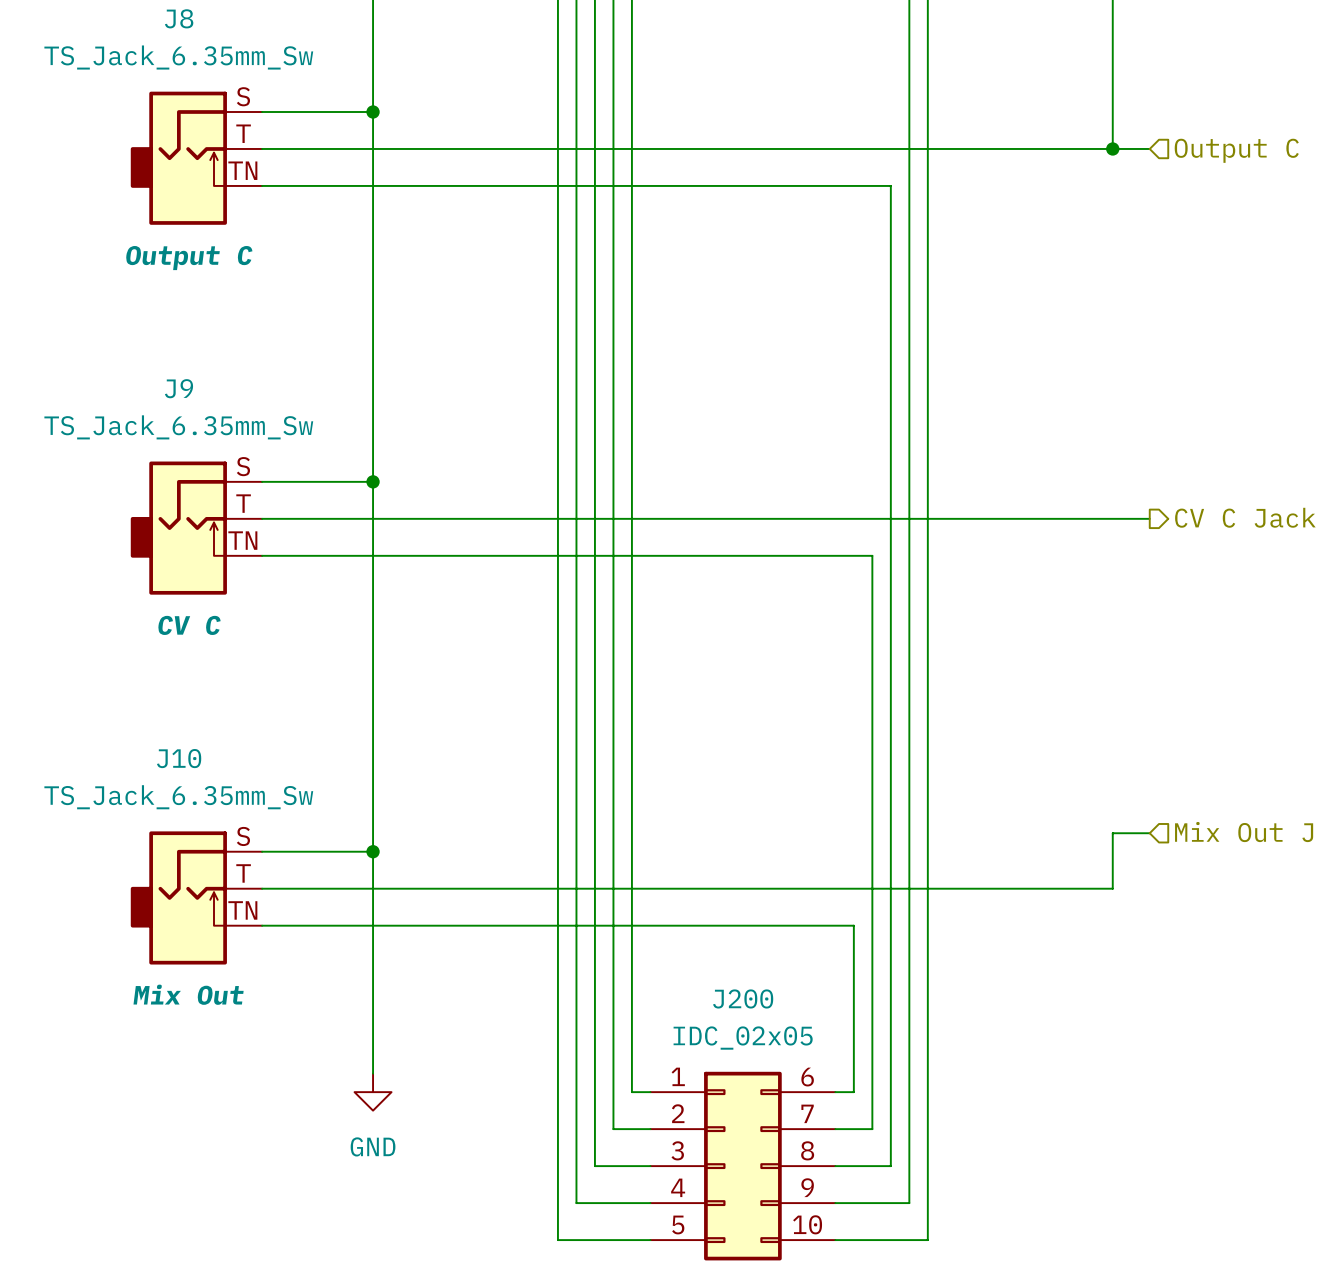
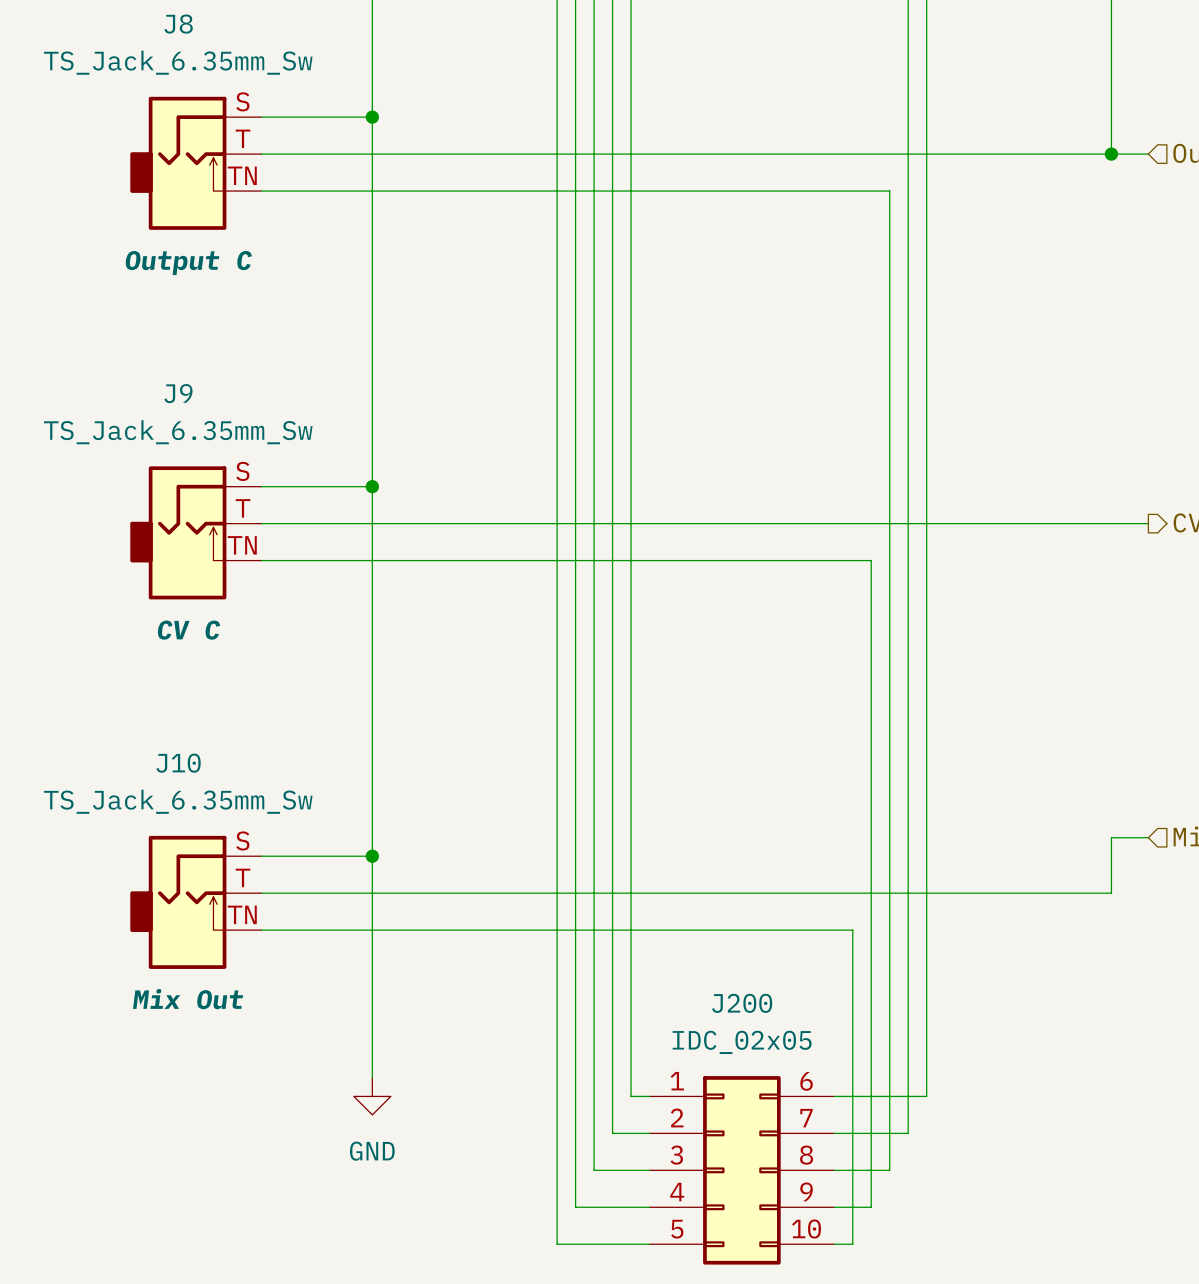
wire: (927, 1092) (927, 1240) (853, 1240) -> (926, 1096) (852, 1096) (852, 1244)
wire: (909, 1129) (909, 1203) (872, 1203) -> (908, 1133) (871, 1133) (871, 1207)

